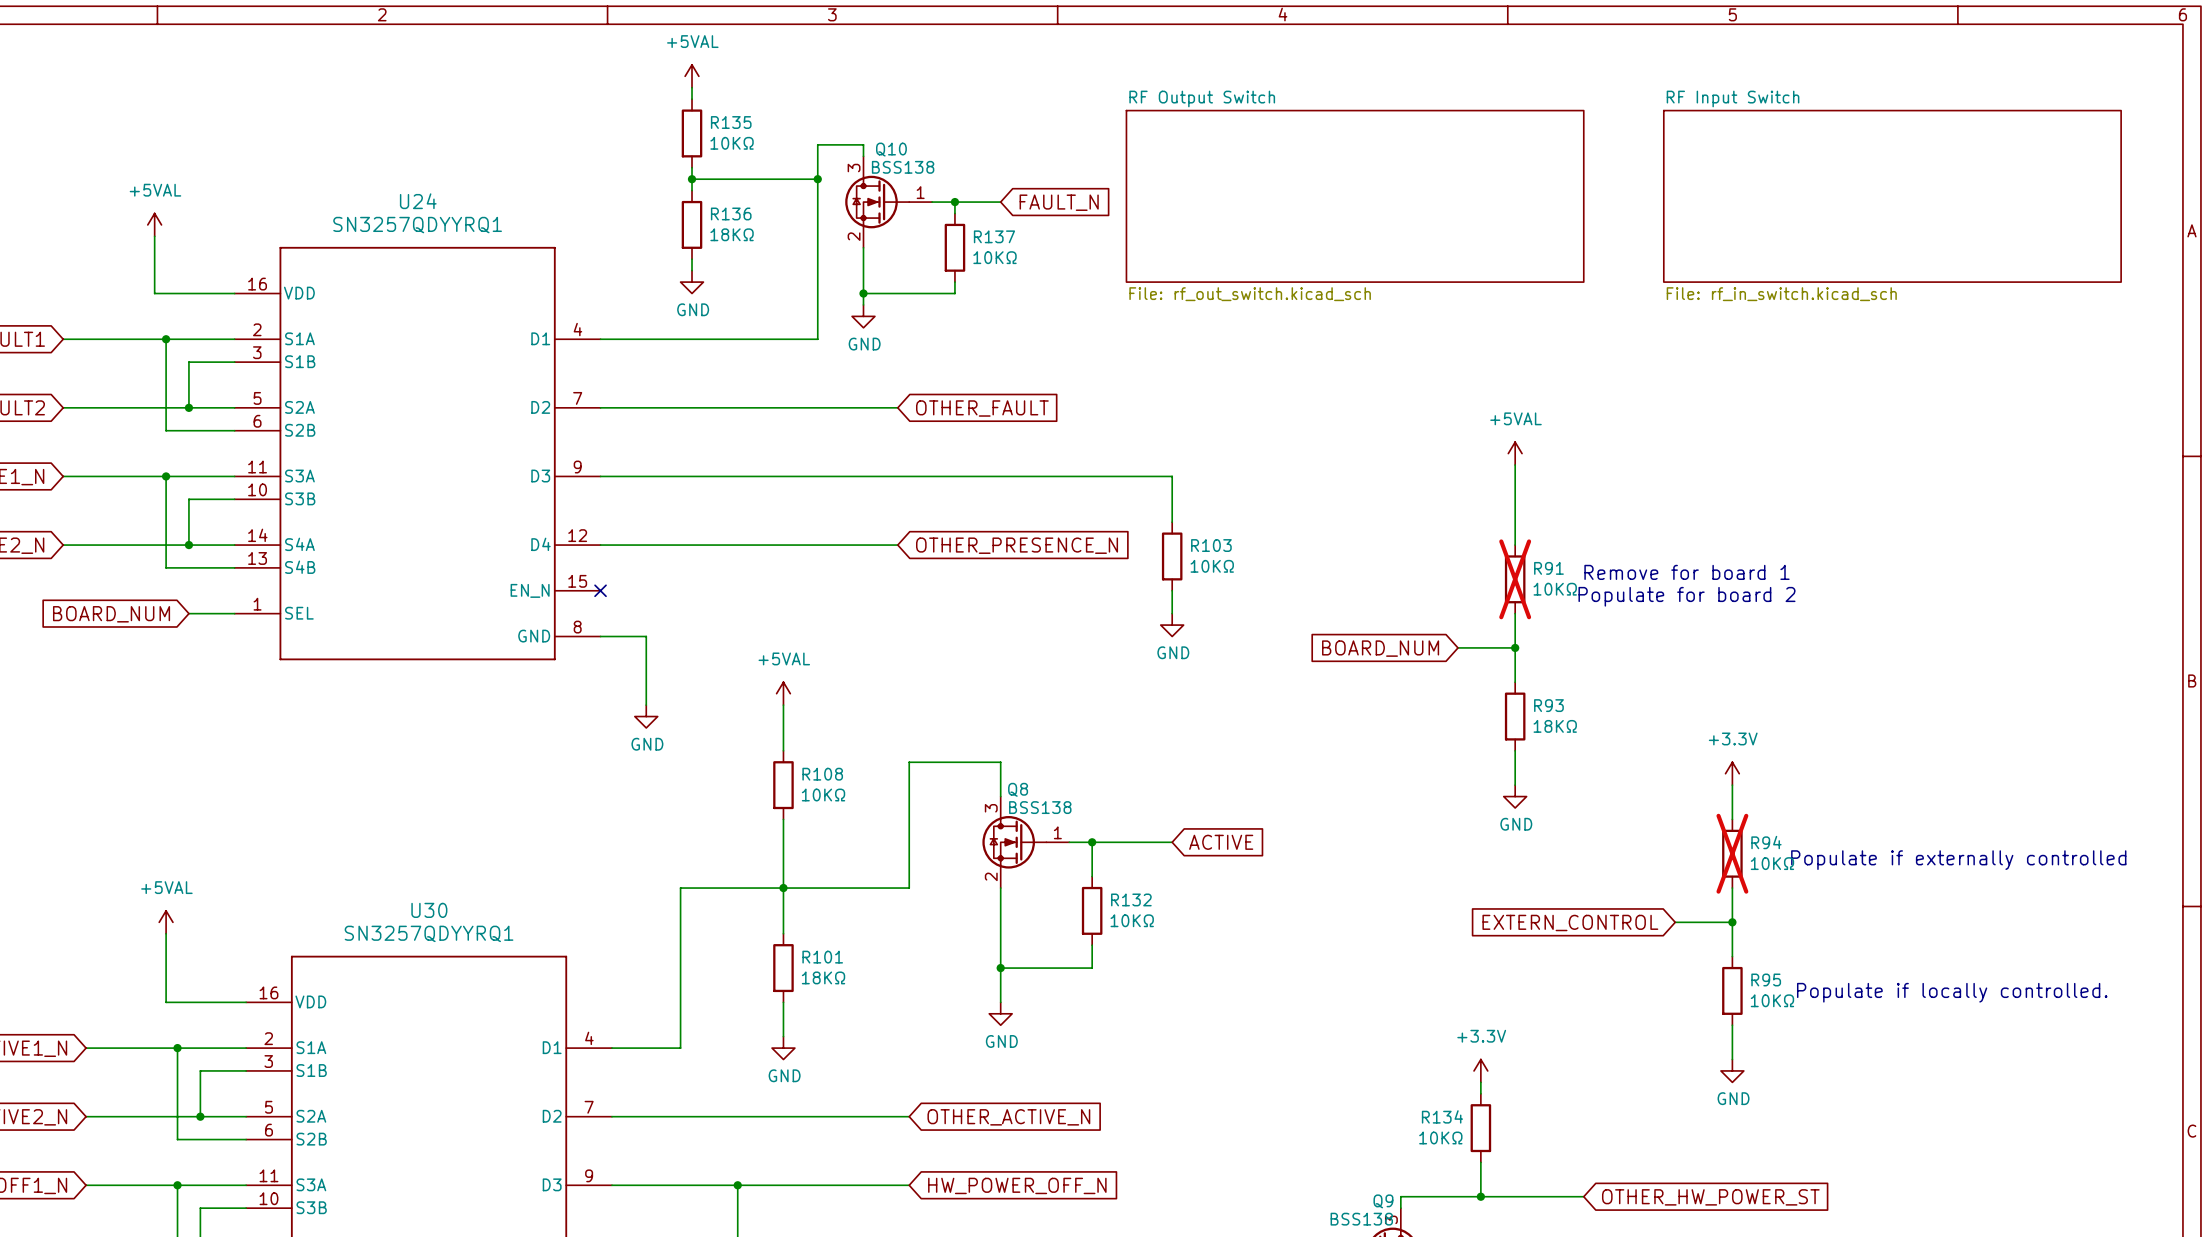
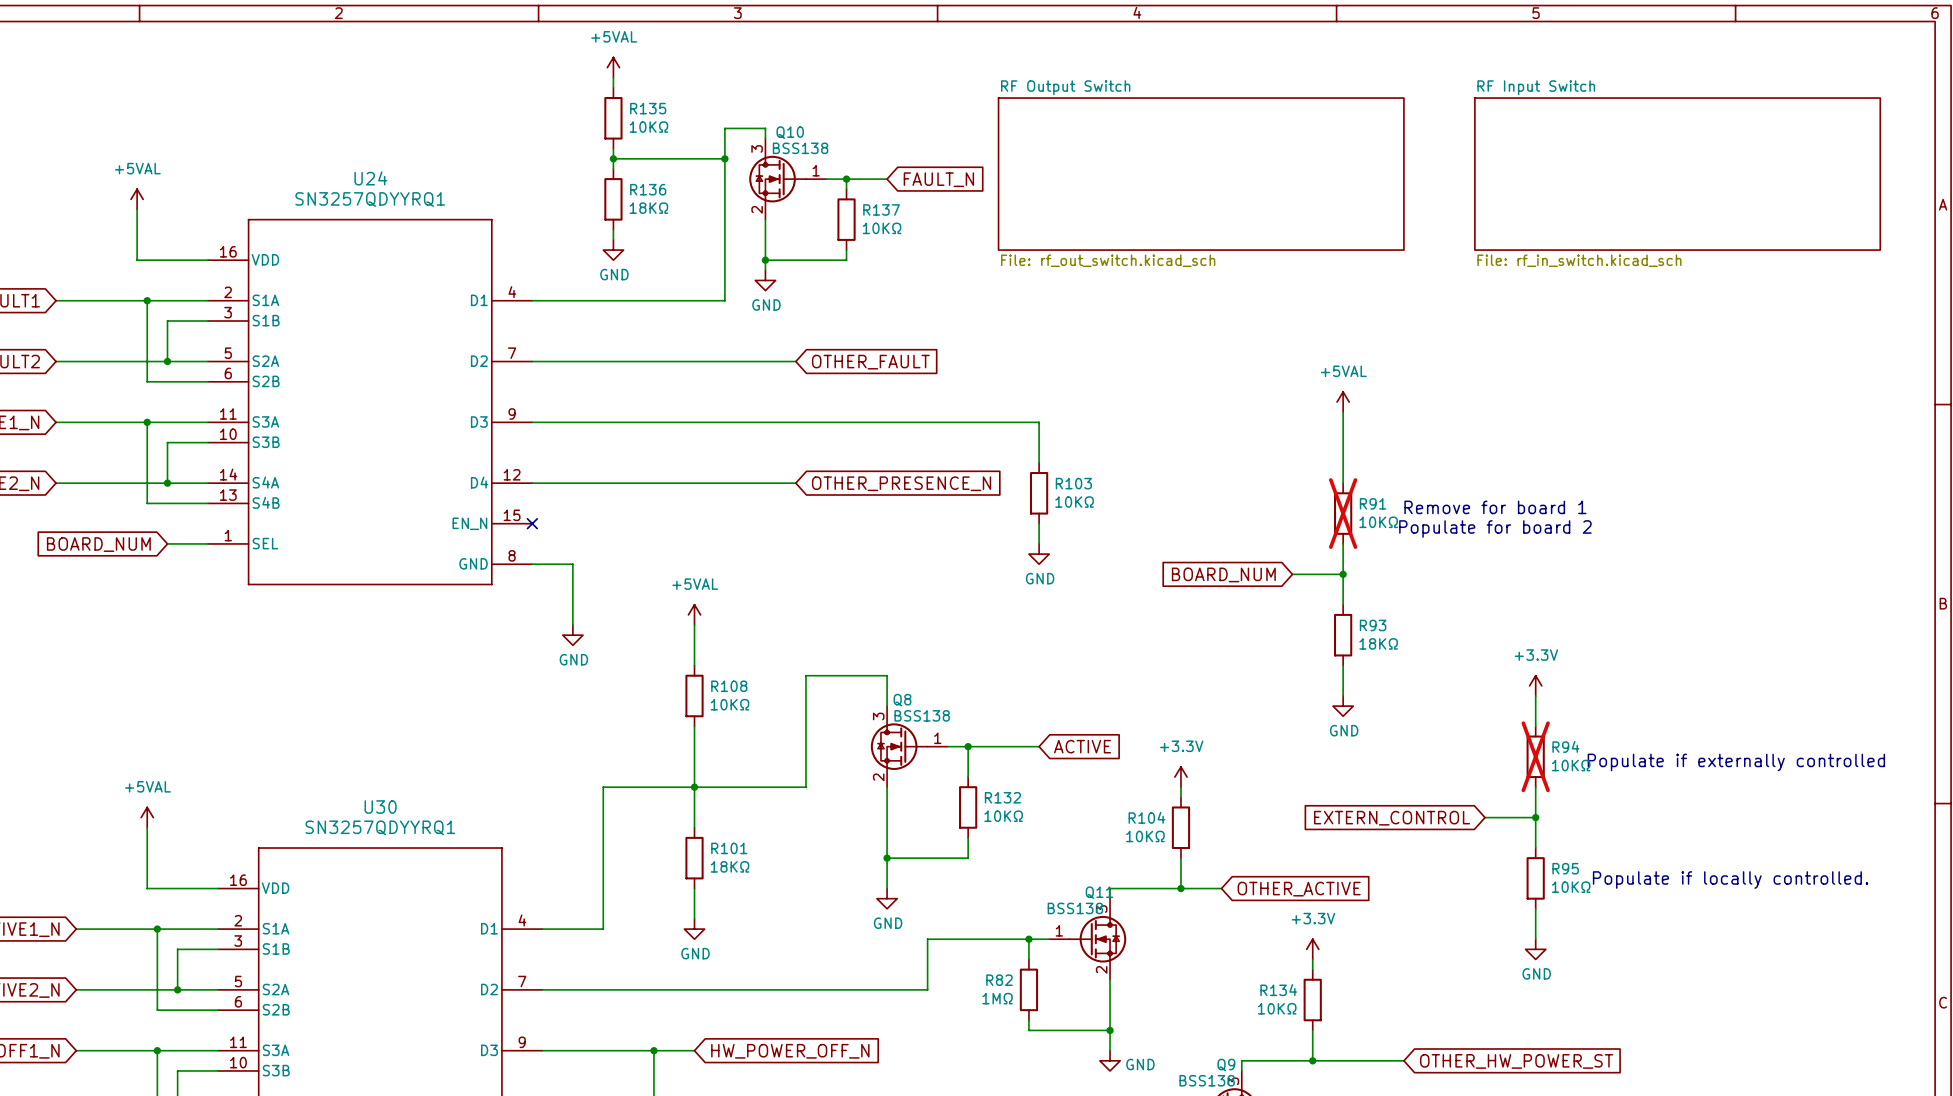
power symbol: none -> +3.3V (1180, 777)
wire: none -> (1180, 787) (1180, 797)
R104: none -> 10KΩ (1180, 827)
wire: none -> (1180, 858) (1180, 888)
junction: none -> (1180, 888)
wire: none -> (1221, 888) (1110, 888) (1110, 898)
global label: none -> OTHER_ACTIVE (1299, 889)
wire: none -> (1028, 939) (1028, 959)
junction: none -> (1028, 939)
wire: none -> (1049, 939) (927, 939) (927, 989) (805, 989)
Q11: none -> BSS138 (1087, 939)
wire: none -> (1110, 979) (1110, 1050)
R82: none -> 1MΩ (1028, 989)
global label: OTHER_ACTIVE_N (1008, 1117) -> none
wire: none -> (1028, 1020) (1028, 1030) (1110, 1030)
junction: none -> (1110, 1030)
wire: (783, 1185) (909, 1185) -> none
global label position: HW_POWER_OFF_N (1017, 1185) -> HW_POWER_OFF_N (790, 1051)
power symbol: none -> GND (1110, 1060)

